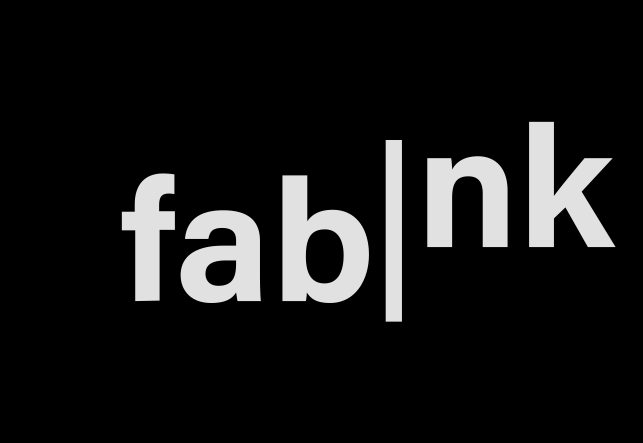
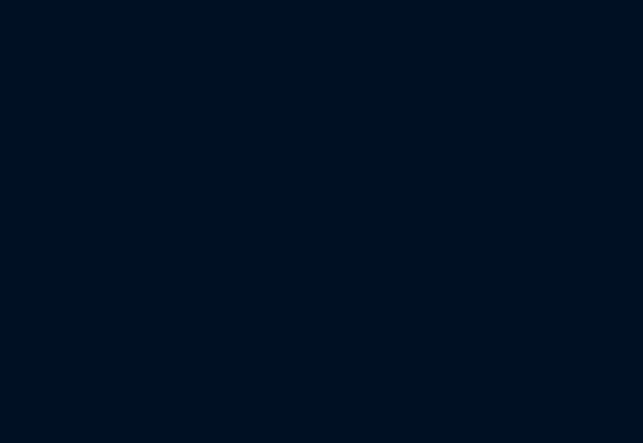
drawing: [121, 121, 616, 322] -> none

